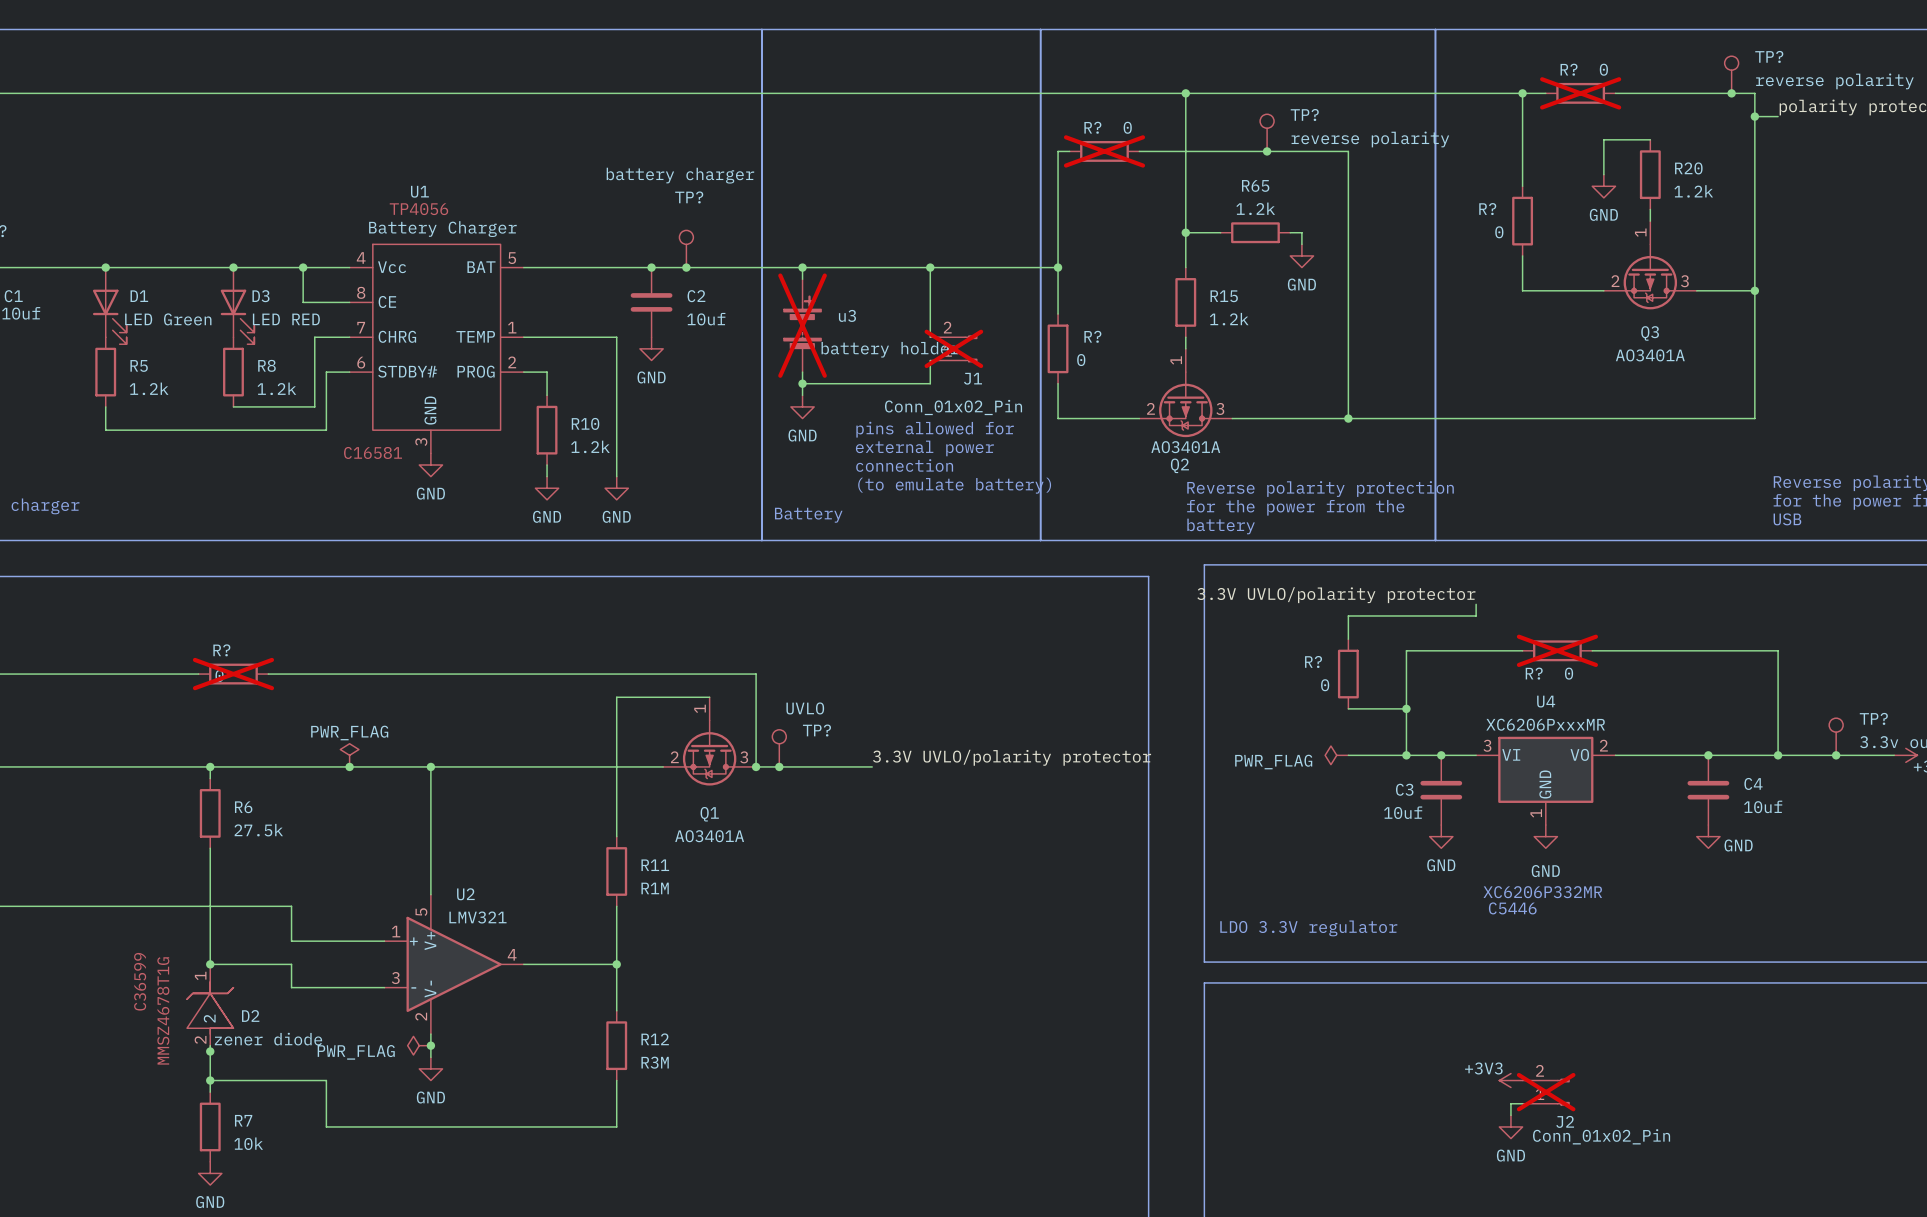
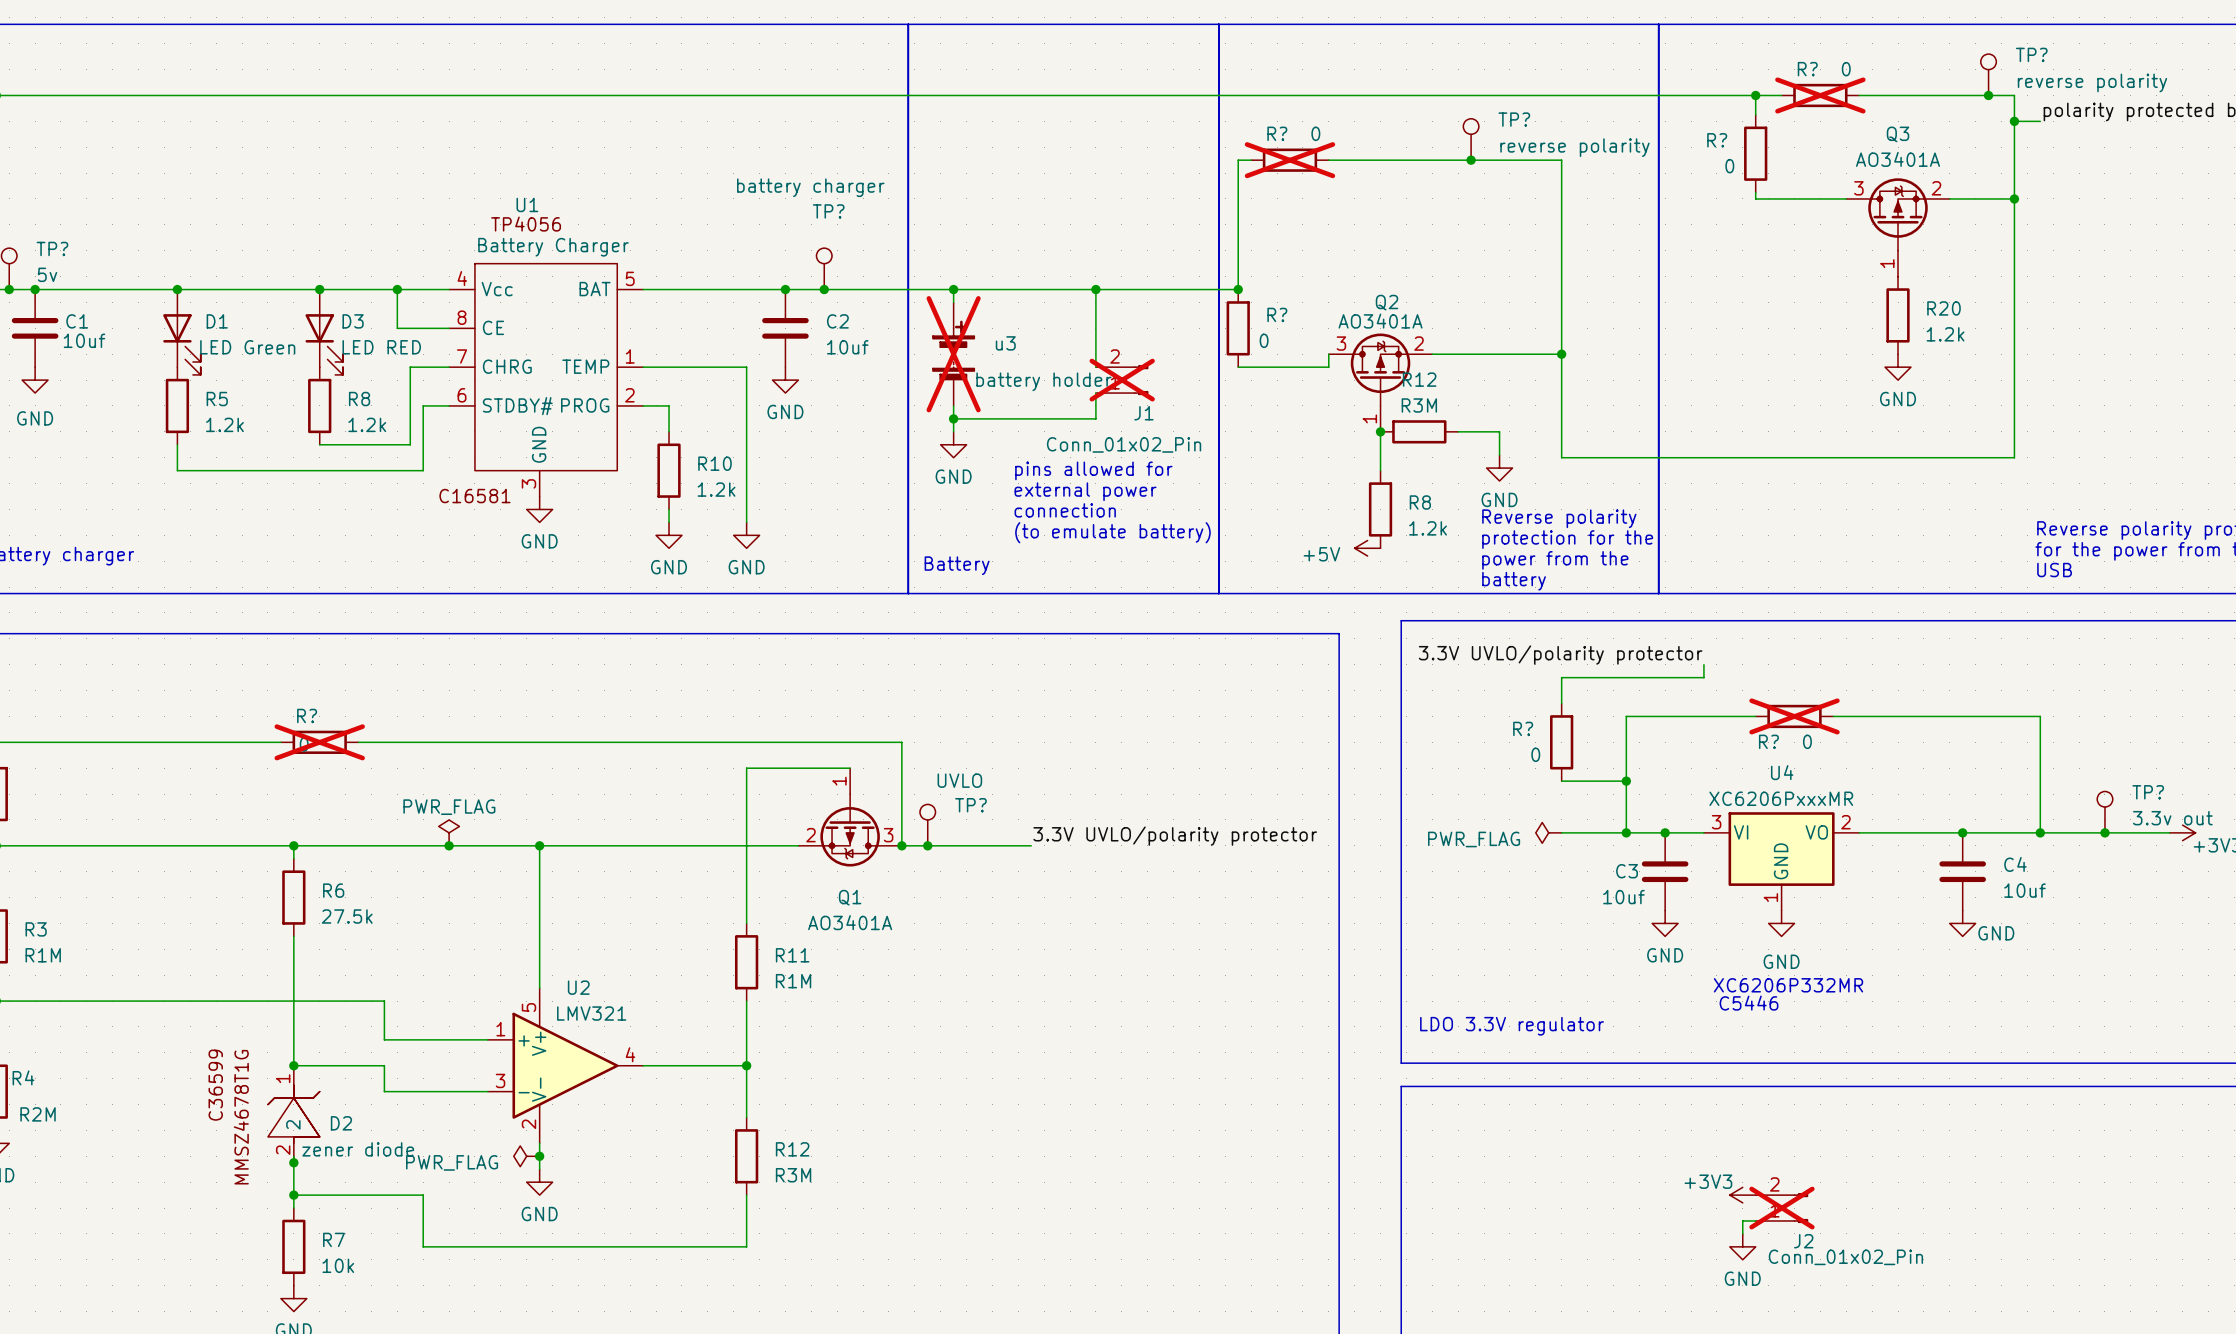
wire: (1185, 93) (1185, 267) -> none
junction: (1185, 93) -> none
wire: (1522, 110) (1522, 180) -> none
wire: (1650, 139) (1603, 139) (1603, 174) -> none
R20 position: (1650, 174) -> (1898, 315)
wire: none -> (1755, 198) (1846, 198)
power symbol position: GND (1603, 186) -> GND (1898, 367)
junction: none -> (2014, 198)
R? position: (1522, 221) -> (1755, 153)
wire: (1185, 232) (1220, 232) -> none
junction: (1185, 232) -> none
R65: 1.2k (1255, 232) -> none
wire: (1290, 232) (1301, 232) (1301, 244) -> none
power symbol position: GND (1301, 255) -> GND (1499, 468)
wire: (1522, 255) (1522, 290) (1603, 290) -> none
wire: (1058, 267) (1058, 314) -> none
Q3 rotation: 0° (1650, 276) -> 180° (1898, 214)
wire: (1696, 290) (1754, 290) -> (1949, 198) (2014, 198)
junction: (1754, 290) -> none
R15: 1.2k (1185, 302) -> none
wire: none -> (1328, 354) (1328, 367) (1238, 367)
junction: none -> (1561, 354)
R? position: (1058, 348) -> (1238, 328)
Q3 value position: AO3401A (1650, 355) -> AO3401A (1898, 159)
wire: (1058, 383) (1058, 418) (1139, 418) -> none
junction: none -> (1380, 431)
R12: none -> R3M (1419, 431)
wire: none -> (1458, 431) (1499, 431) (1499, 455)
Q2 rotation: 0° (1185, 404) -> 180° (1380, 369)
wire: (1232, 418) (1348, 418) -> (1432, 354) (1561, 354)
junction: (1348, 418) -> none
R8: none -> 1.2k (1380, 509)
text: Reverse polarity protection (1320, 489) -> Reverse polarity (1559, 518)
text: none -> protection for the (1567, 539)
power symbol: none -> +5V (1367, 548)
text: for the power from the (1295, 507) -> power from the (1555, 560)
text position: battery (1221, 526) -> battery (1514, 581)

